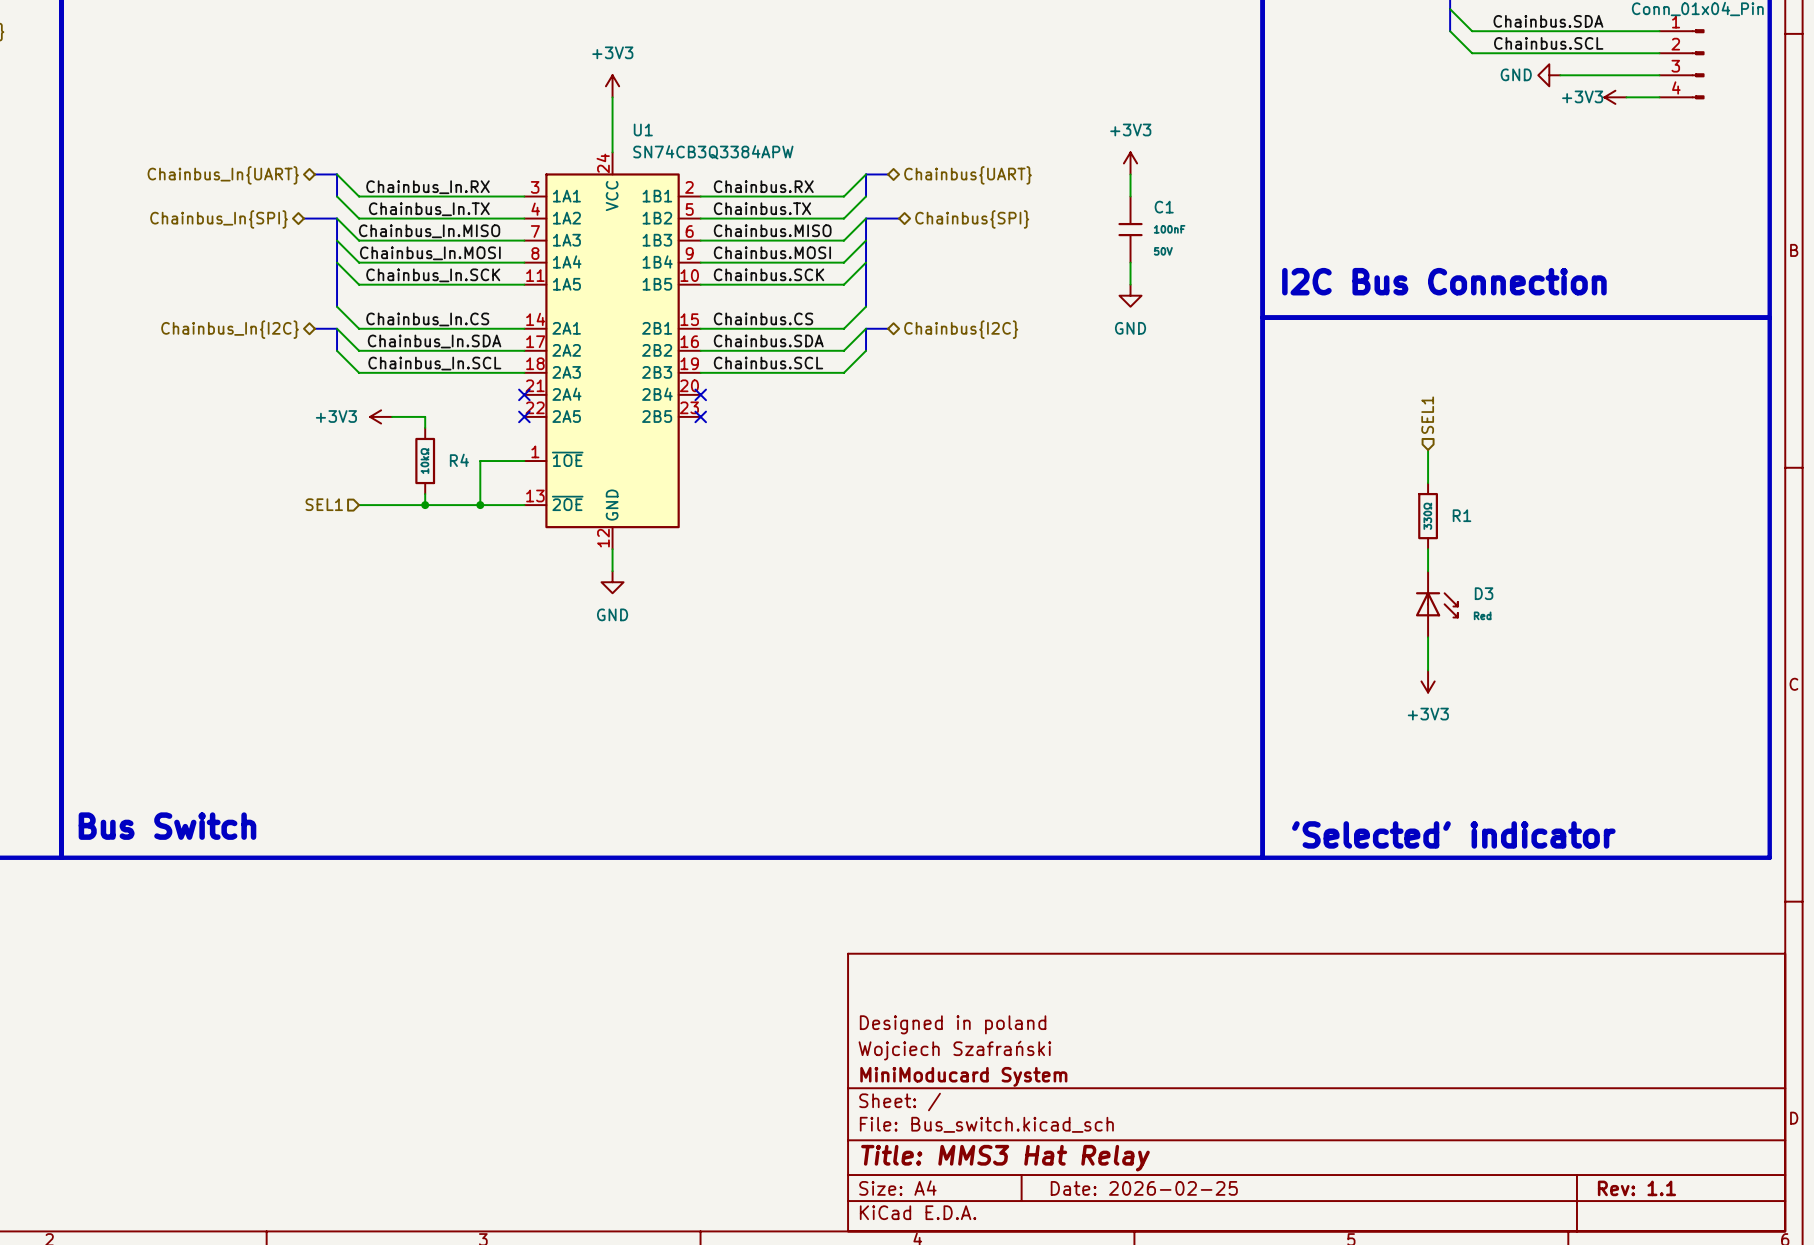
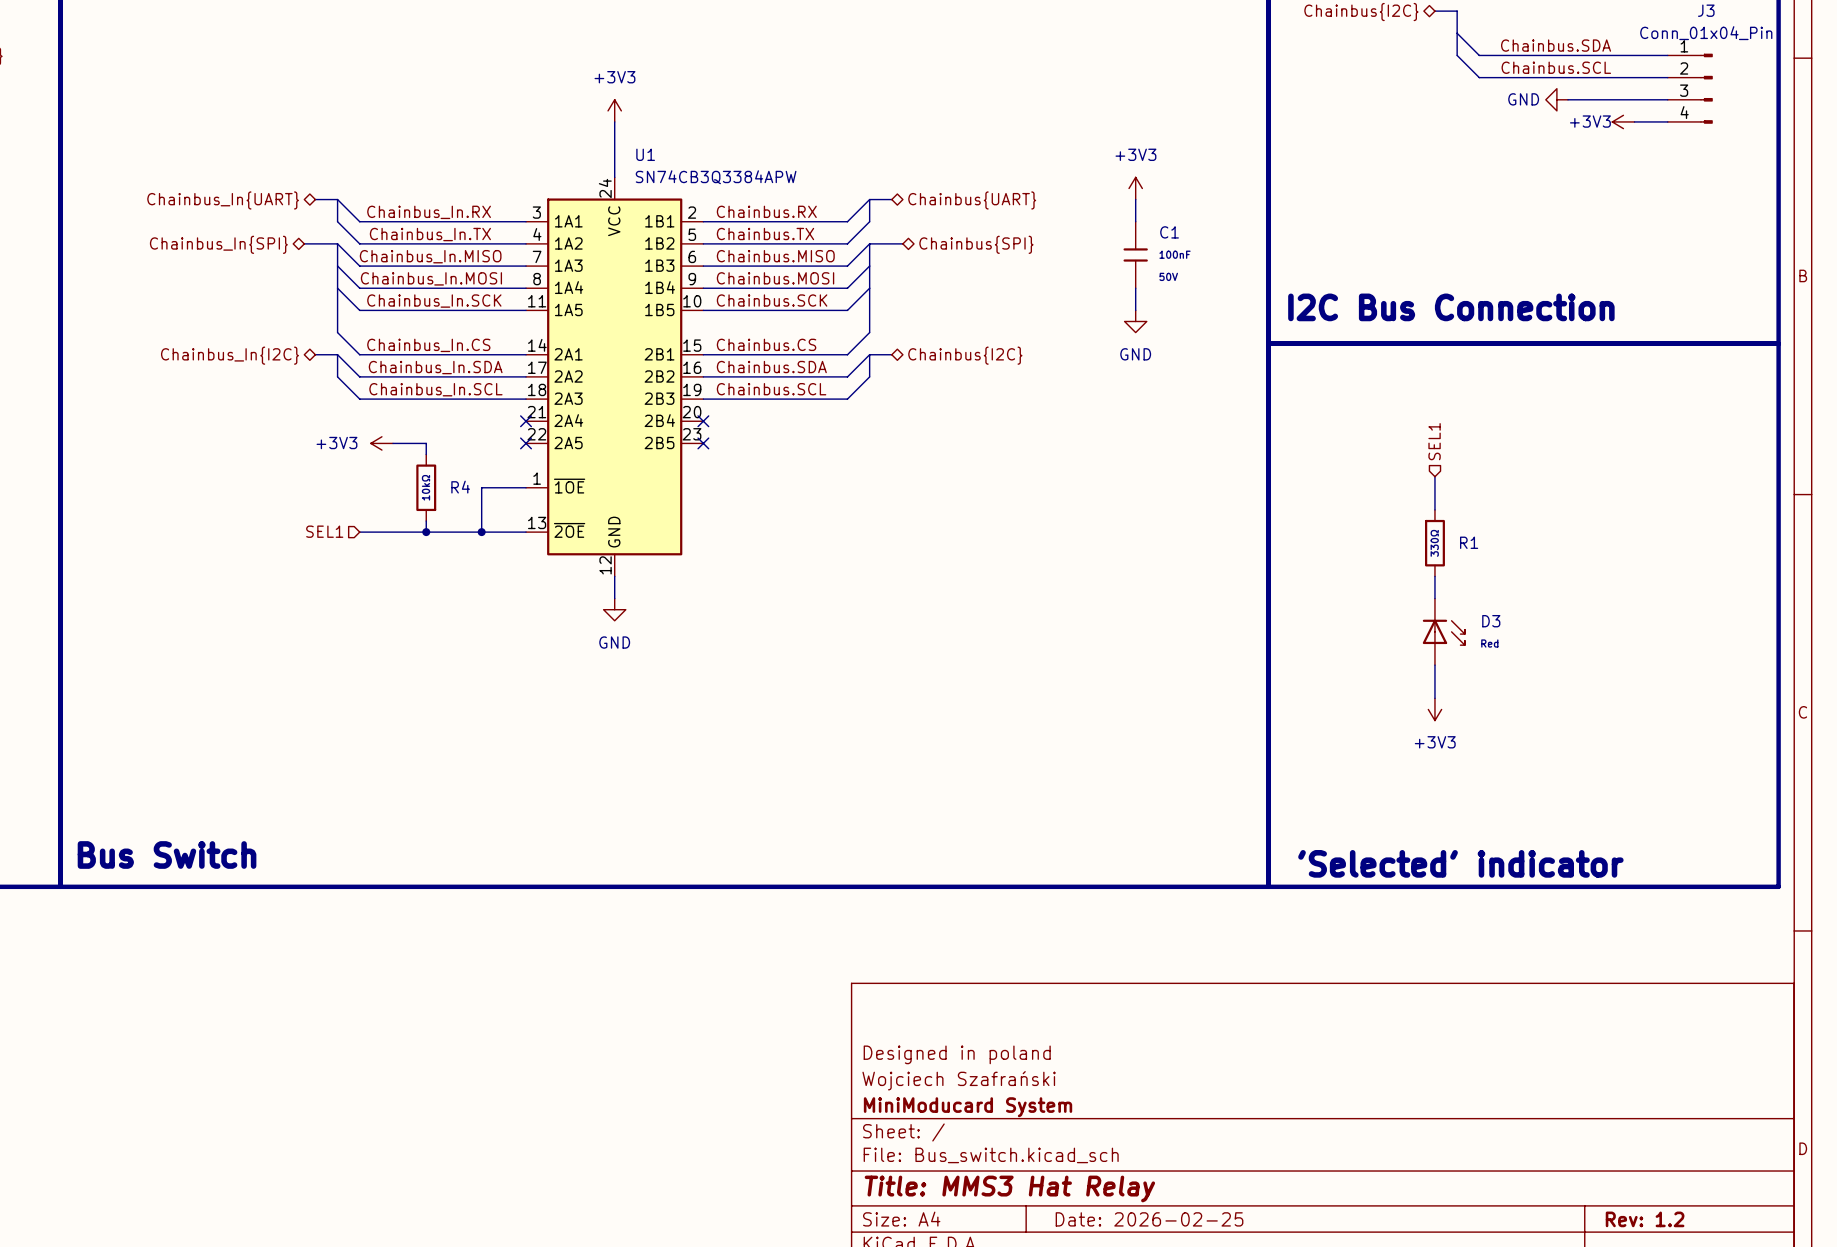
title block: Rev: 1.1 (1636, 1188) -> Rev: 1.2 (1645, 1219)

